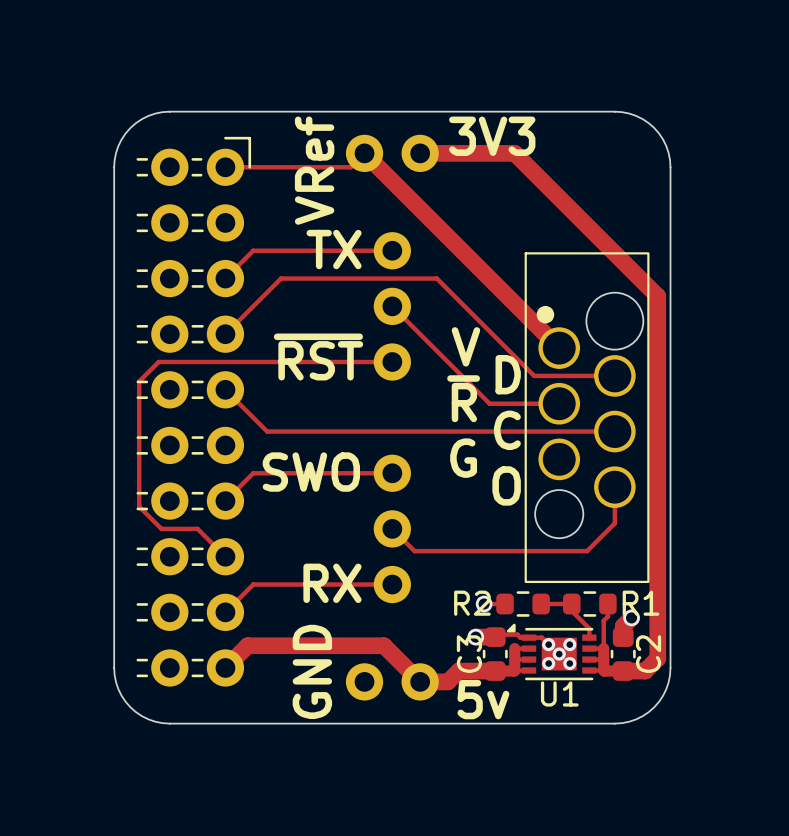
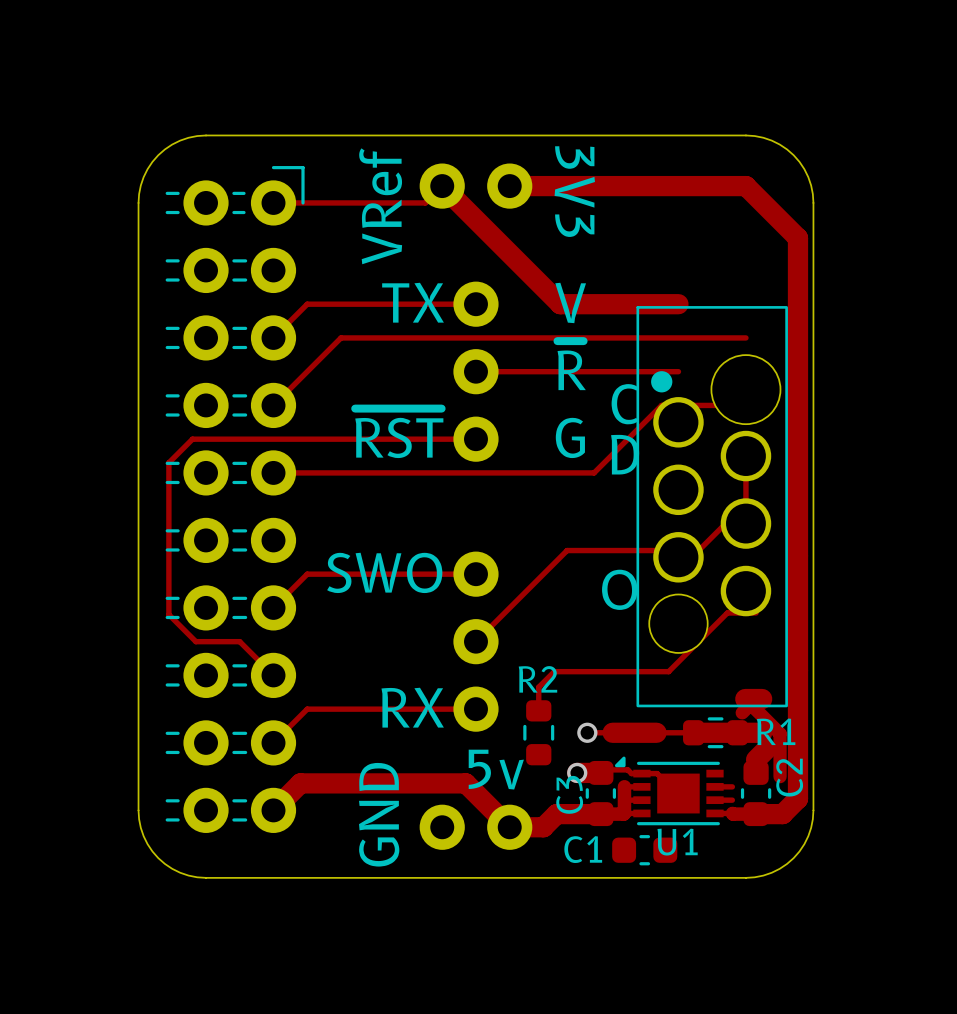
text rotation: 0° (492, 136) -> 90° clockwise (574, 191)
track: (514, 153) (657, 296) -> (624, 186) (745, 186) (797, 238) (797, 359)
track: (461, 250) (559, 348) -> (560, 304) (678, 304)
track: (436, 278) (534, 375) (614, 375) -> (529, 337) (745, 337)
track: (392, 306) (489, 403) (559, 403) -> (475, 371) (678, 371)
text position: V (465, 346) -> V (570, 302)
track: (225, 389) (267, 431) (614, 431) -> (273, 472) (594, 472) (661, 405) (745, 405)
text position: ~{R} (463, 398) -> ~{R} (571, 365)
text position: C (507, 430) -> C (625, 404)
text position: G (463, 458) -> G (570, 437)
track: (614, 487) (614, 523) (587, 551) (414, 551) (392, 528) -> (745, 472) (745, 503) (698, 550) (567, 550) (475, 641)
track: none -> (756, 612) (727, 612) (668, 671) (554, 671) (538, 687) (538, 710)
track: none -> (762, 699) (745, 699) (780, 733) (780, 776)
track: none -> (745, 709) (742, 712)
track: none -> (612, 732) (656, 732)
R2 rotation: 0° (523, 604) -> 90° clockwise (538, 732)
R2 position: (523, 604) -> (538, 732)
track: (571, 604) (571, 610) (589, 628) (589, 637) -> (693, 732) (762, 732)
track: (607, 604) (607, 616) (603, 620) (603, 670) -> none
via: (631, 617) -> none
via: (548, 644) -> none
via: (569, 644) -> none
via: (559, 654) -> none
C2 name position: C2 (648, 654) -> C2 (789, 777)
via: (548, 663) -> none
via: (569, 663) -> none
text position: 5v (483, 699) -> 5v (496, 769)
C1: none -> (644, 850)

